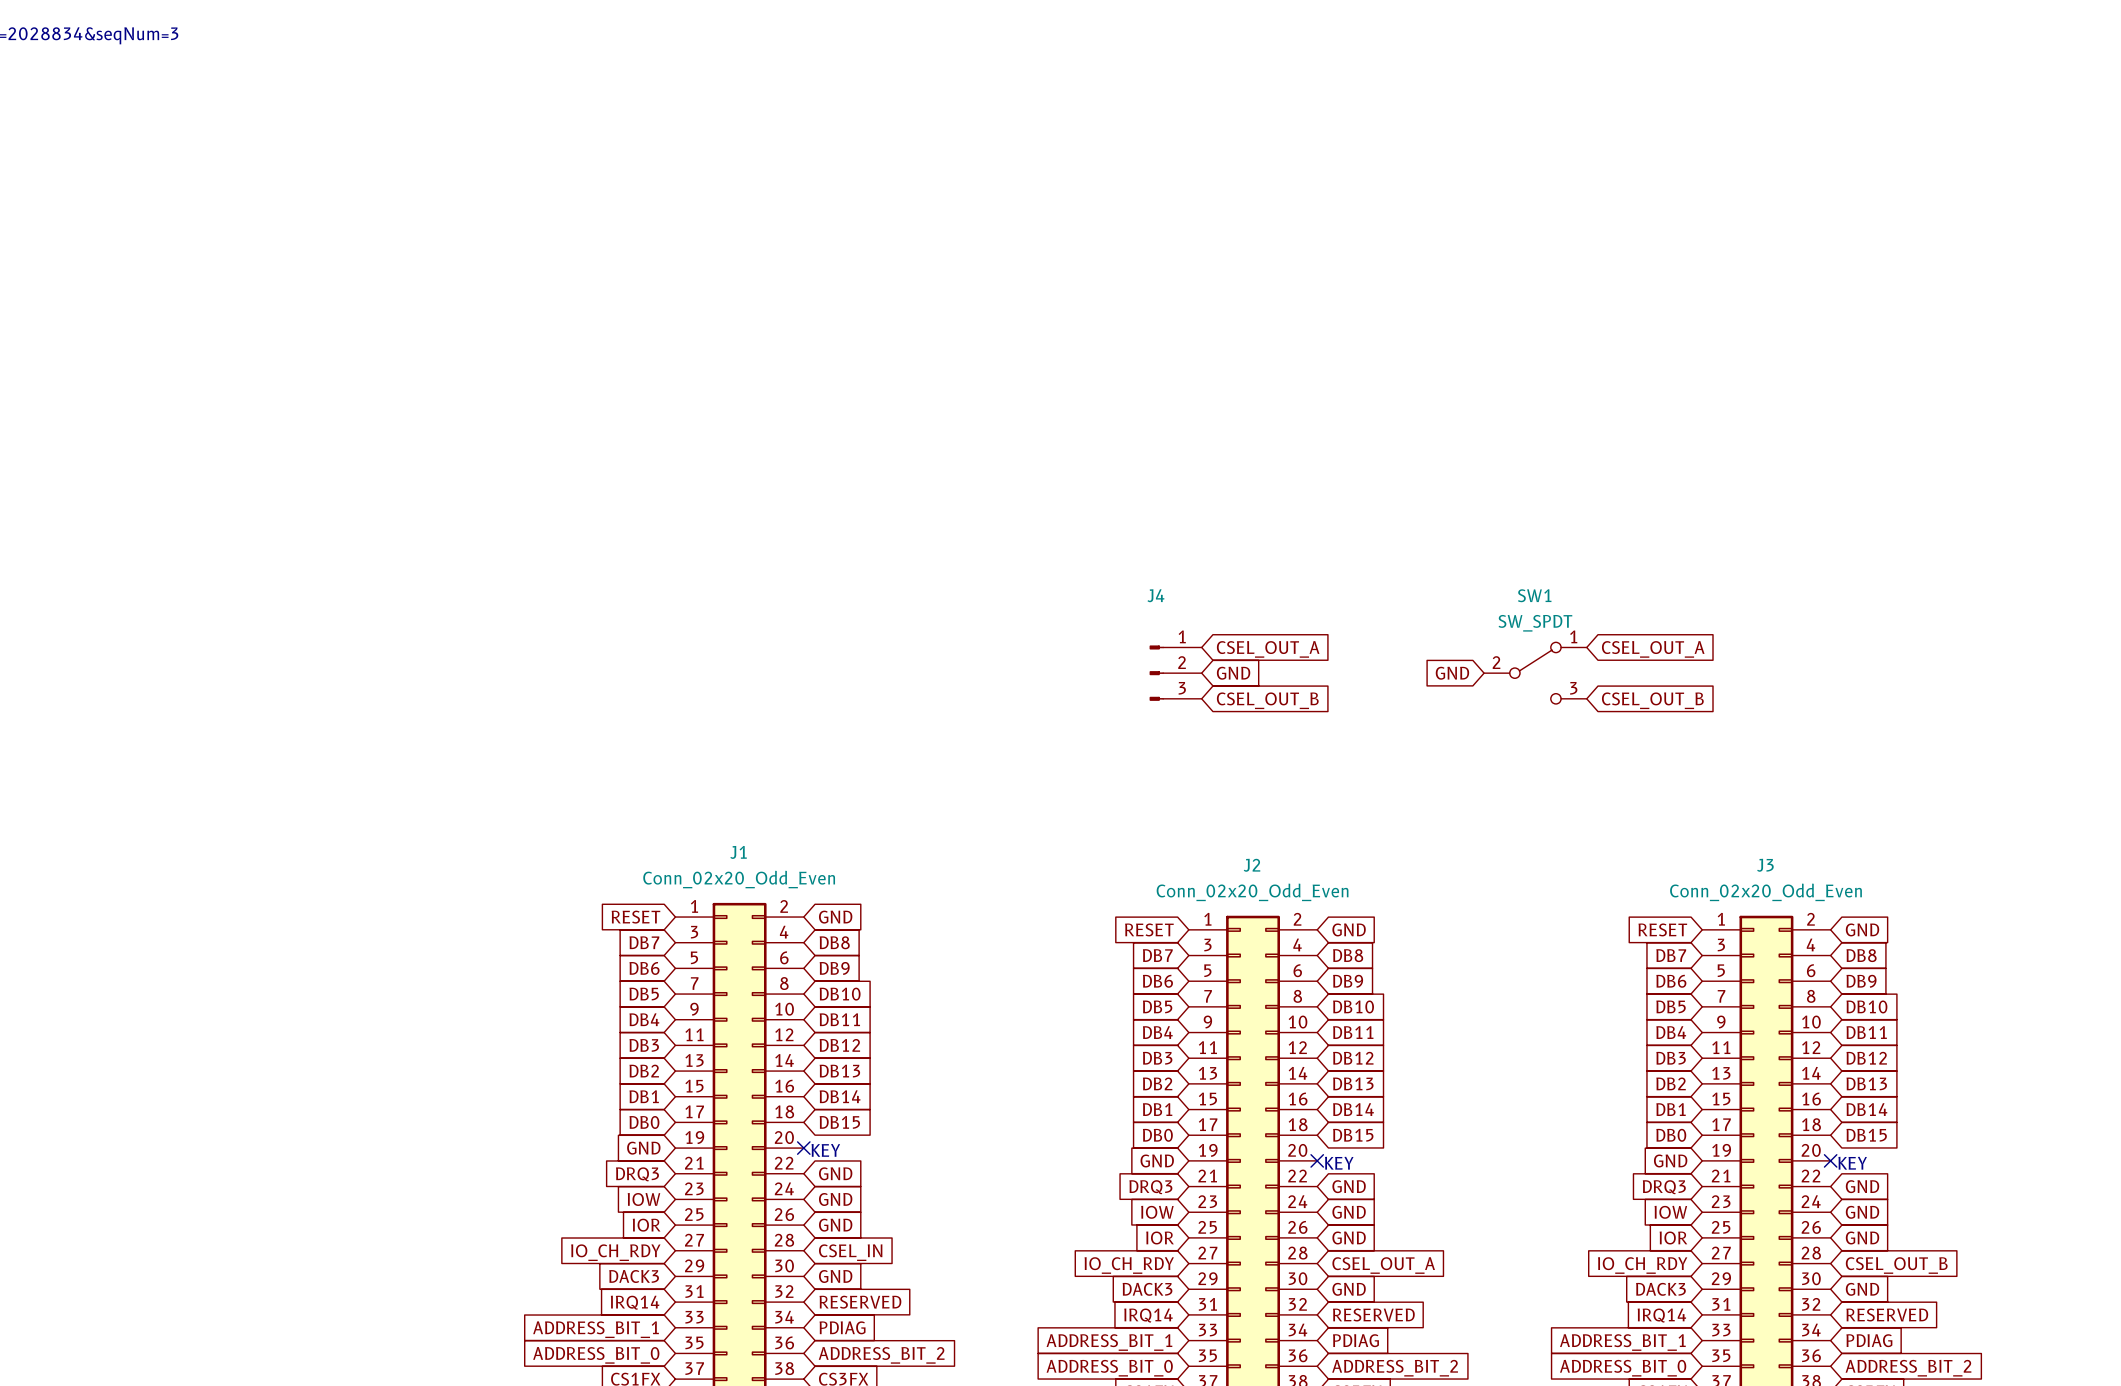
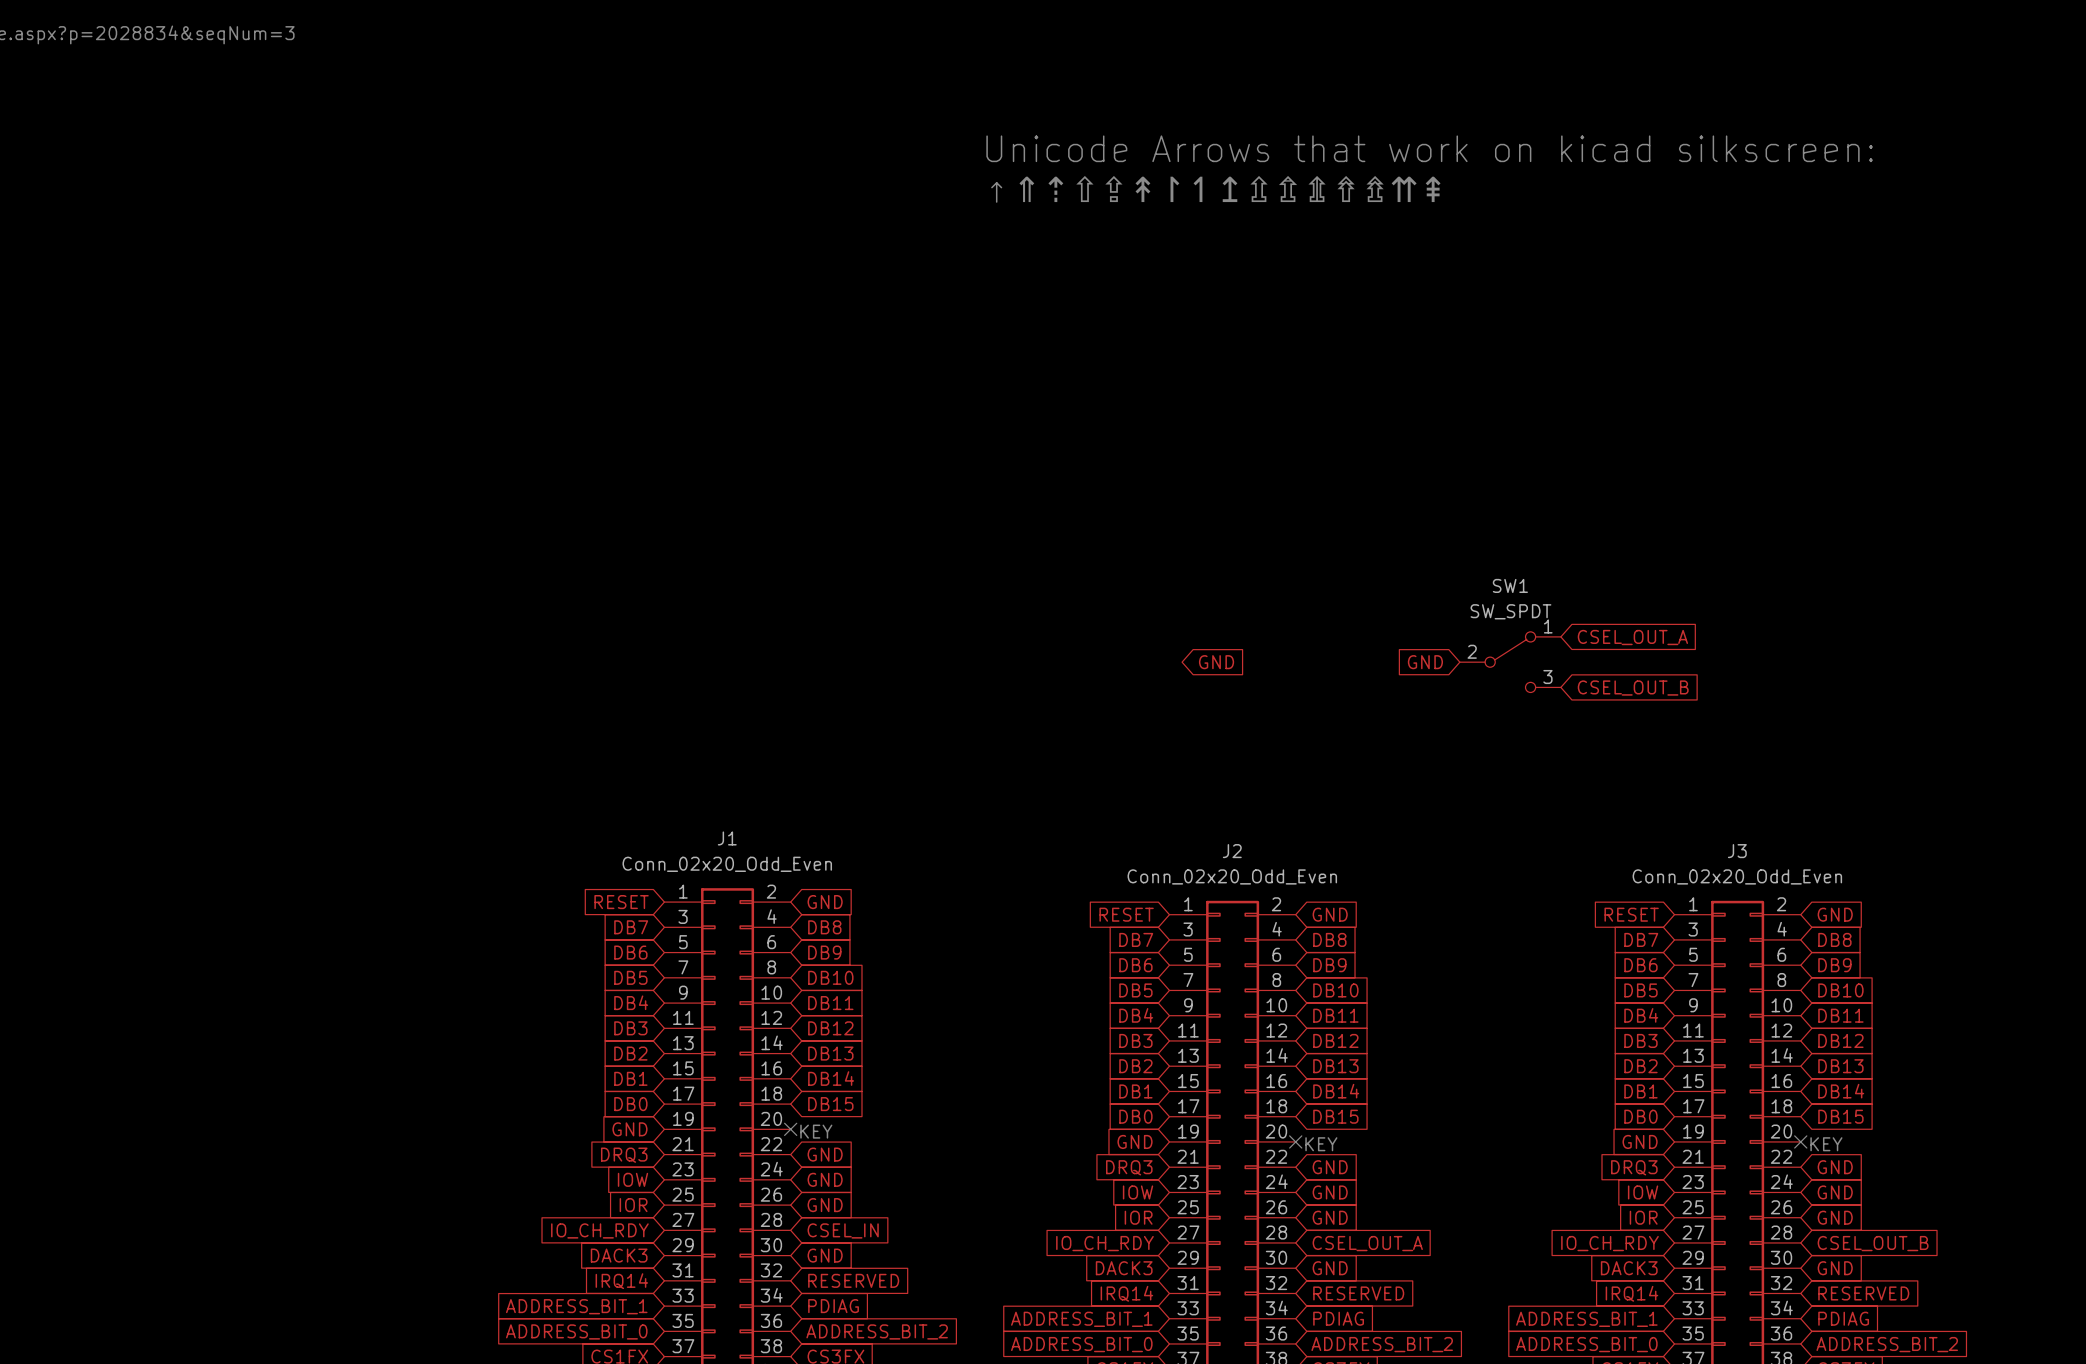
text: none -> Unicode Arrows that work on kicad silkscreen: (1429, 148)
text: none -> ↑⇑⇡︎⇧⇪↟↾↿↥⇫⇬⇭⇮⇯⇈⇞ (1216, 189)
global label: CSEL_OUT_A (1268, 649) -> none
J4: (1175, 673) -> none
global label: CSEL_OUT_B (1267, 700) -> none

